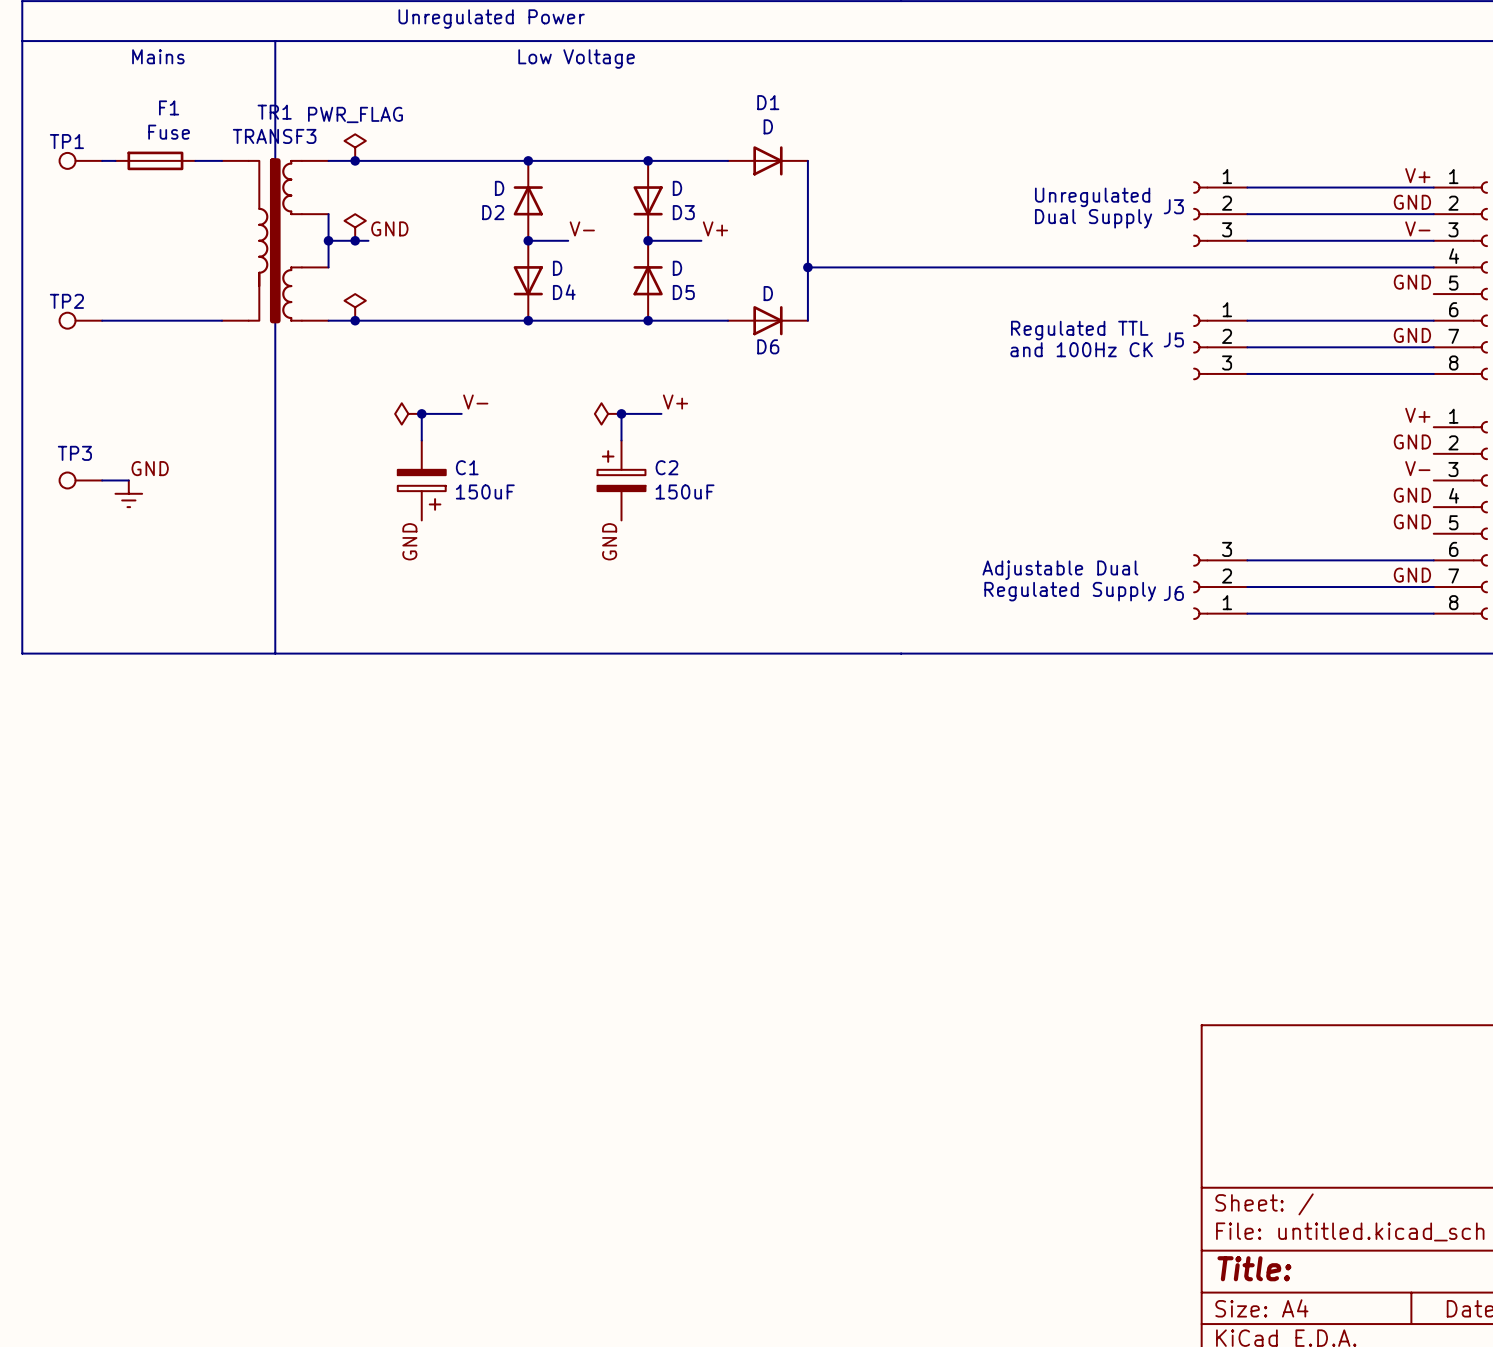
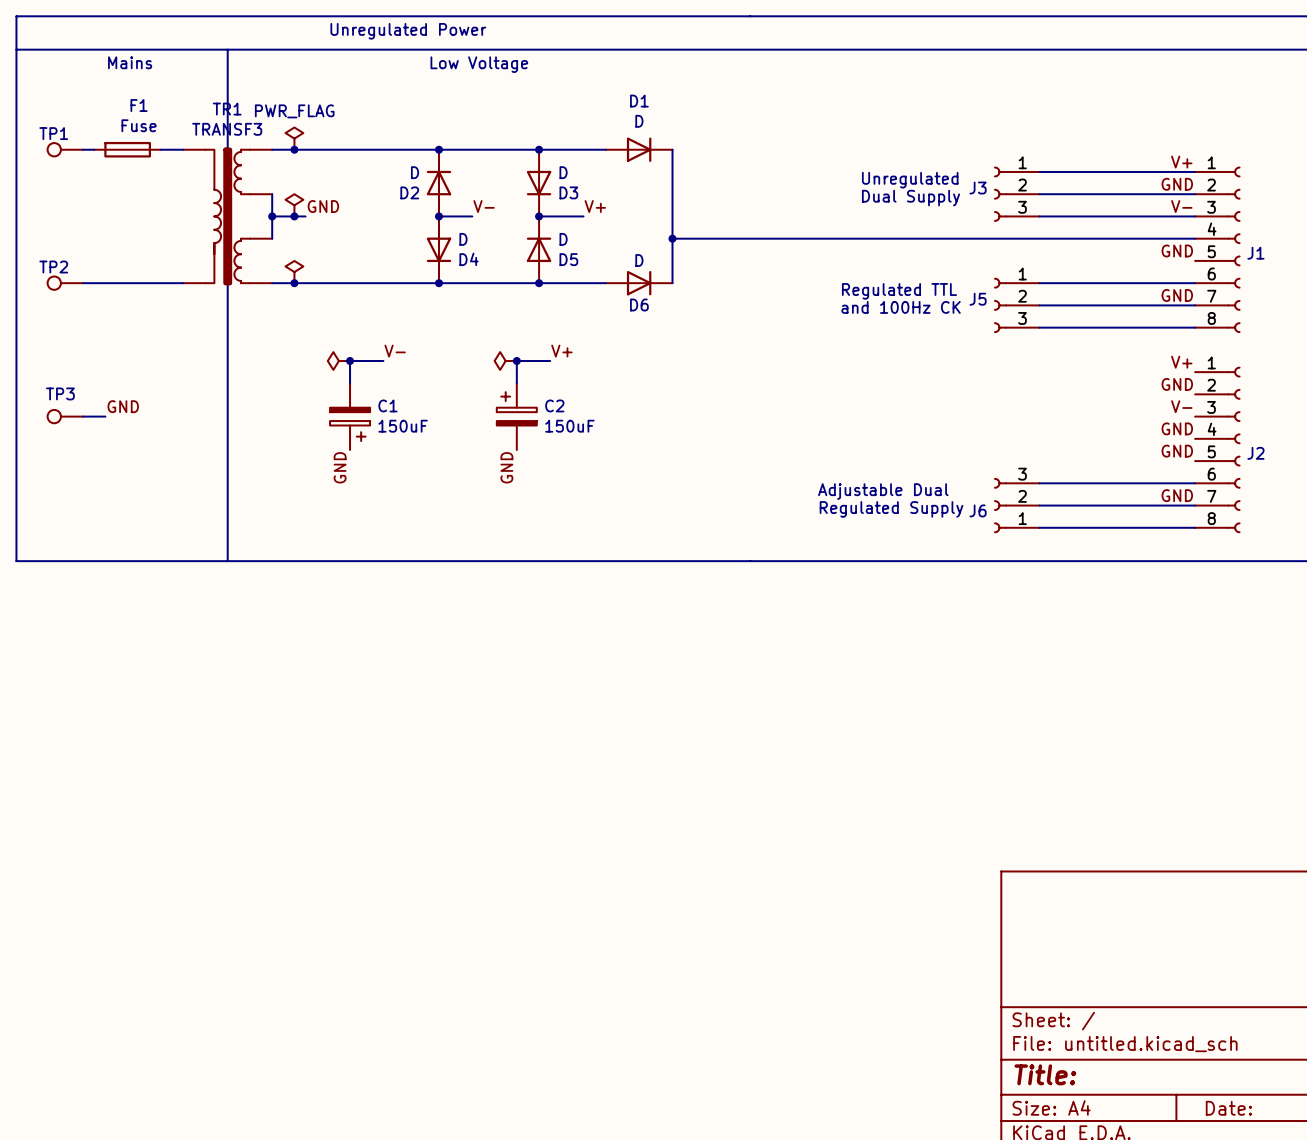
power symbol: (128, 493) -> none

